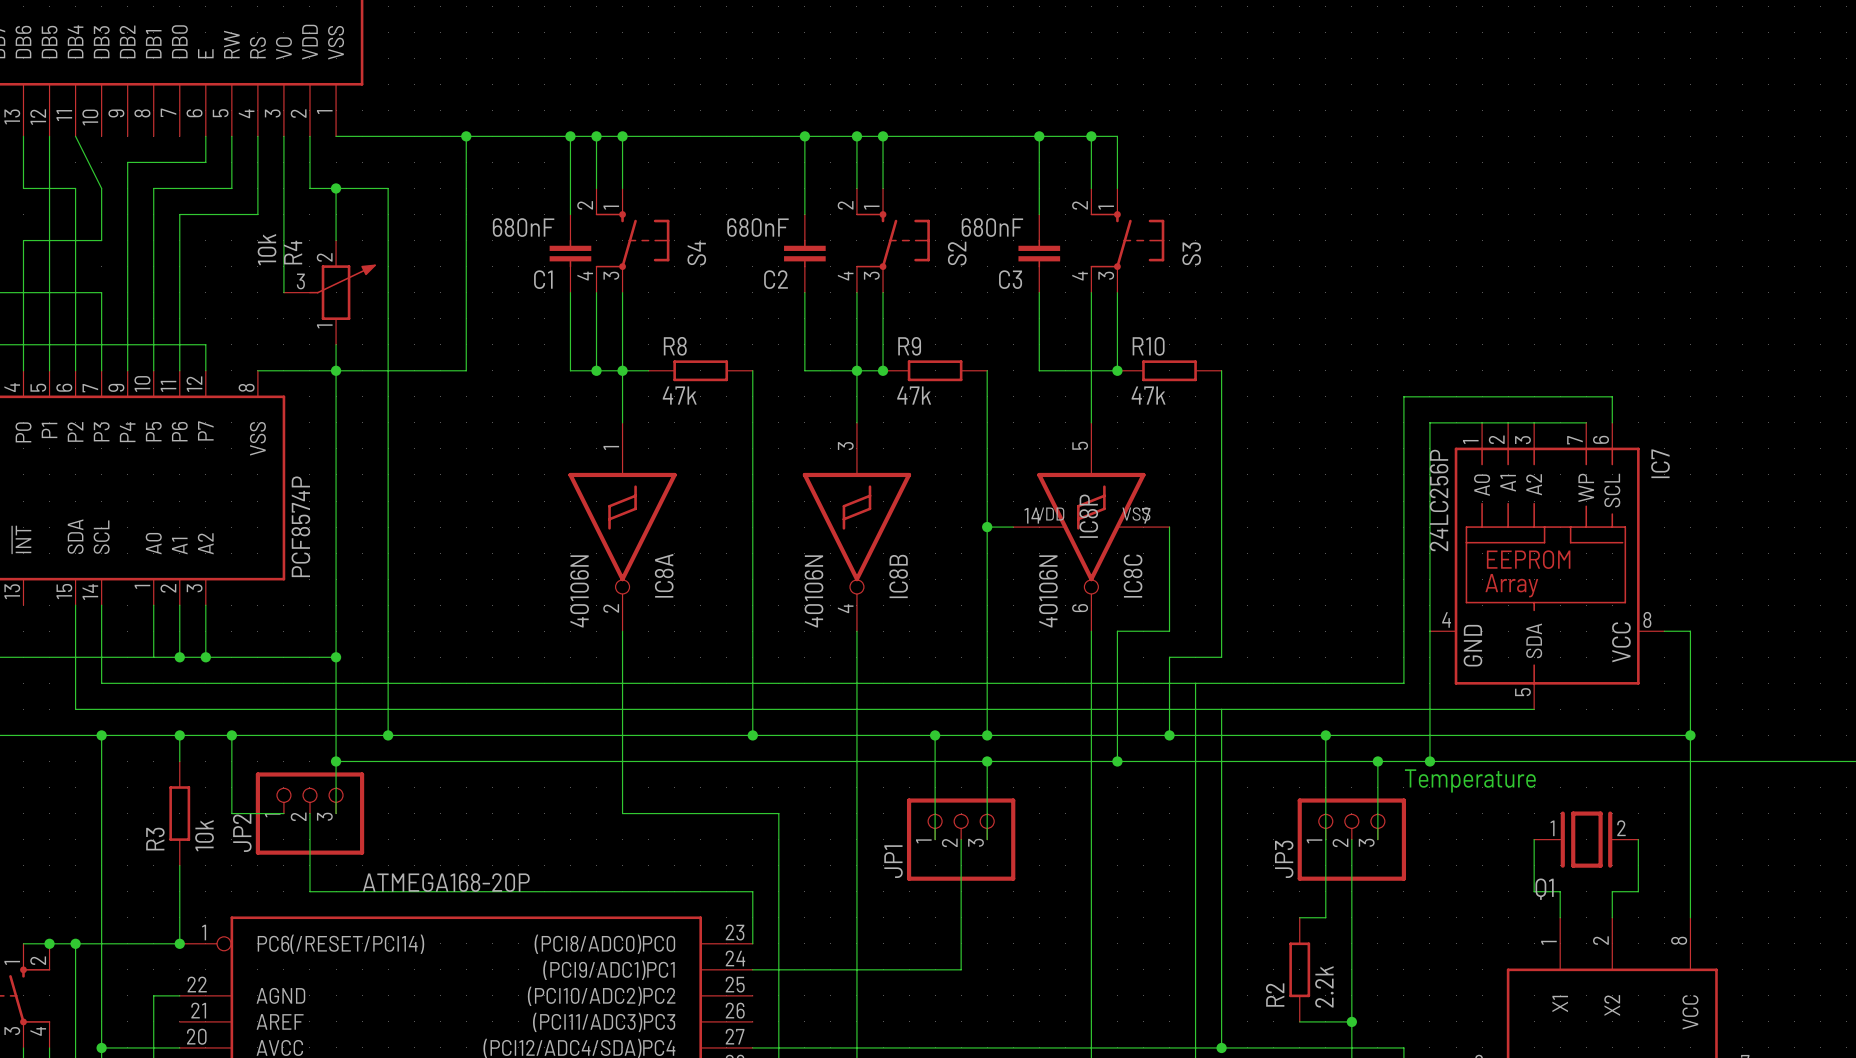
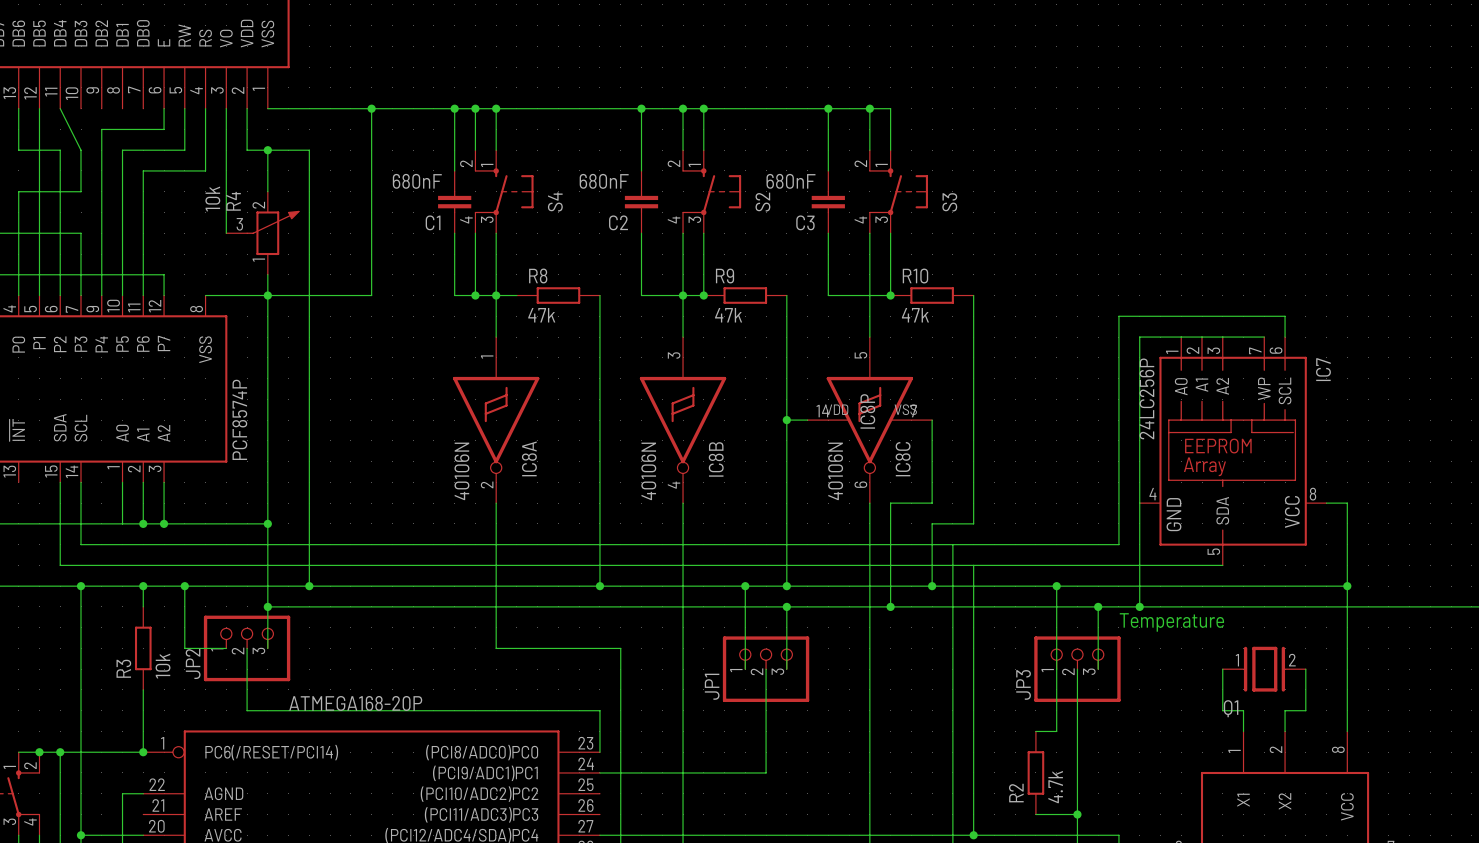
R2 value: 2.2k (1324, 986) -> 4.7k (1055, 787)

